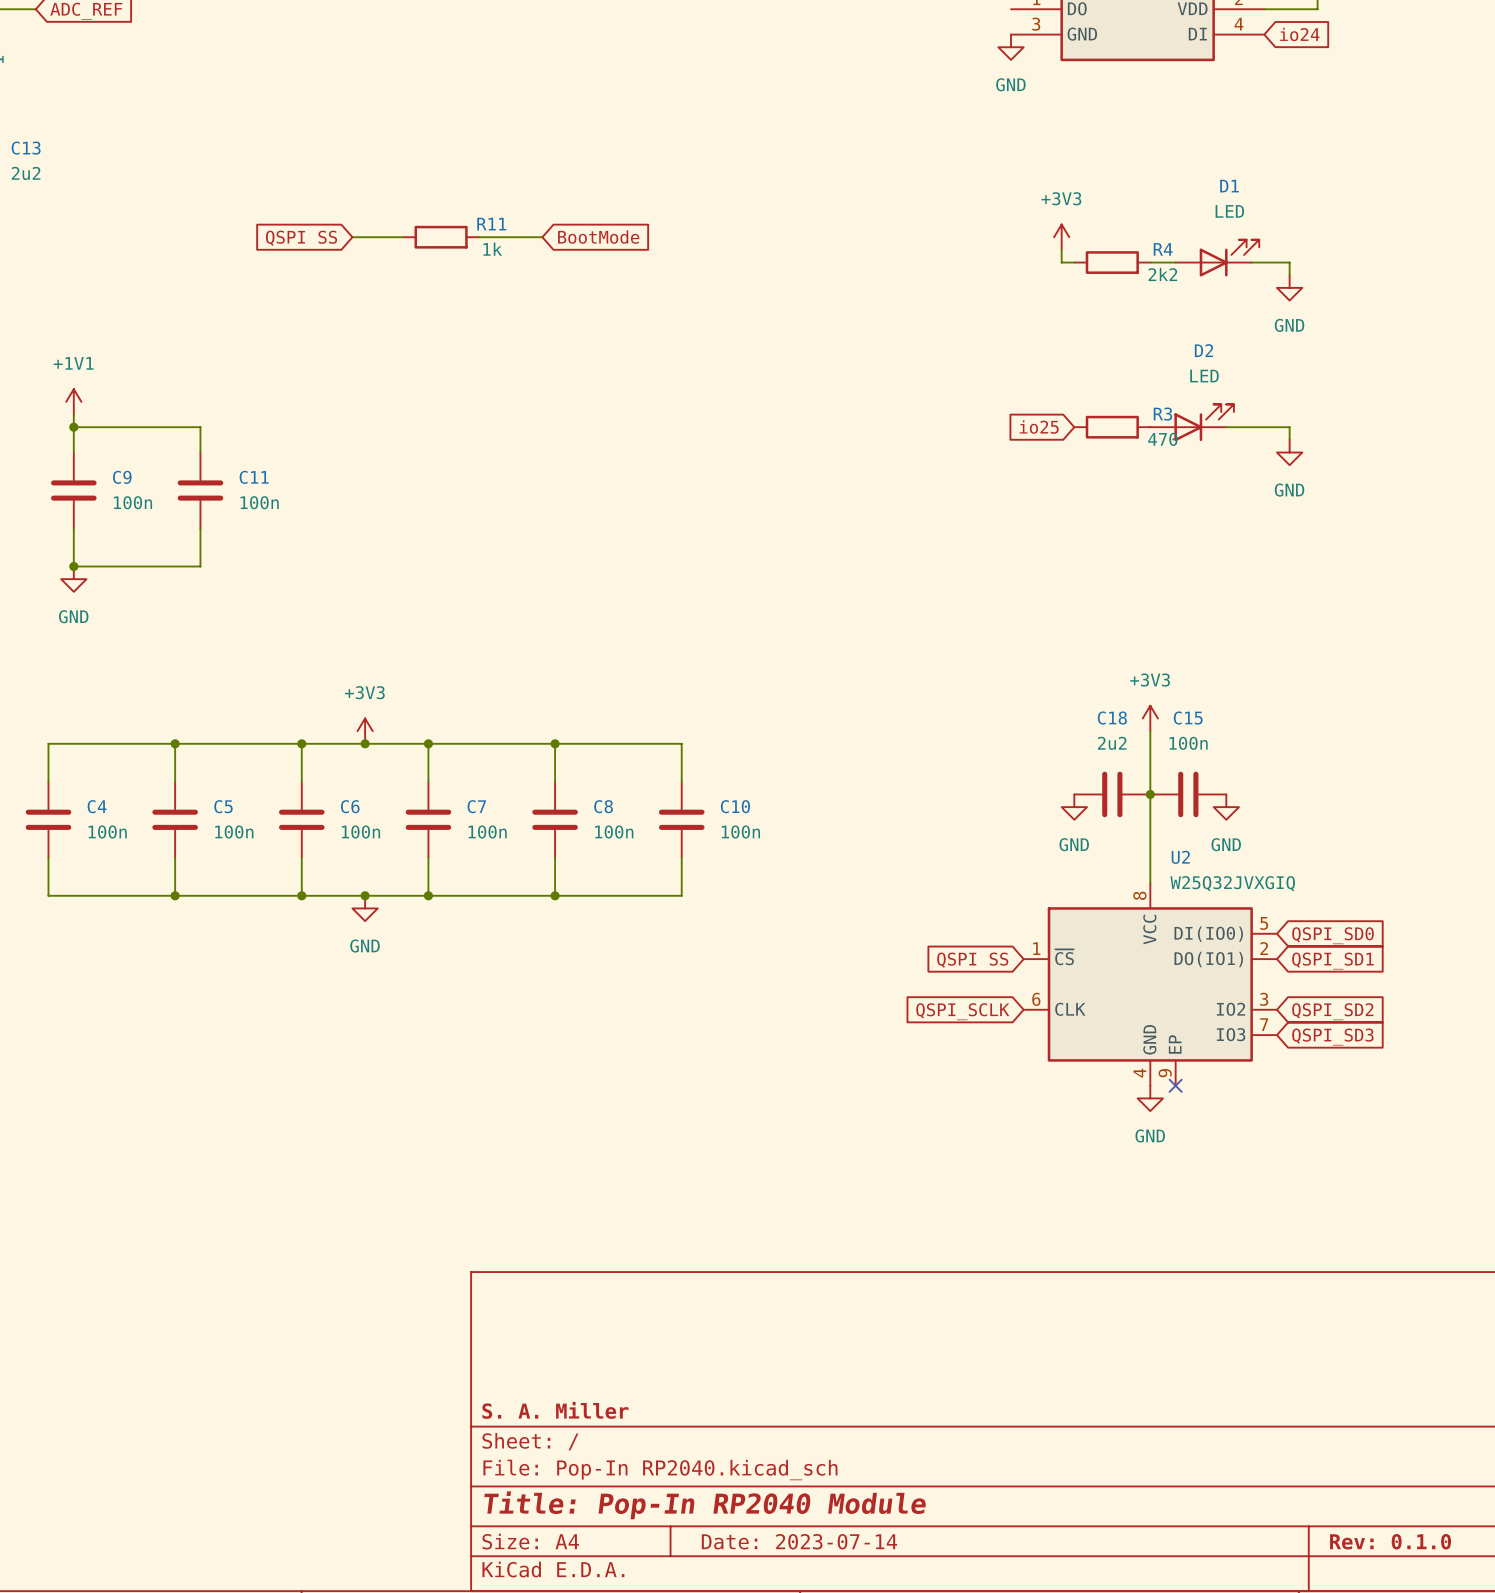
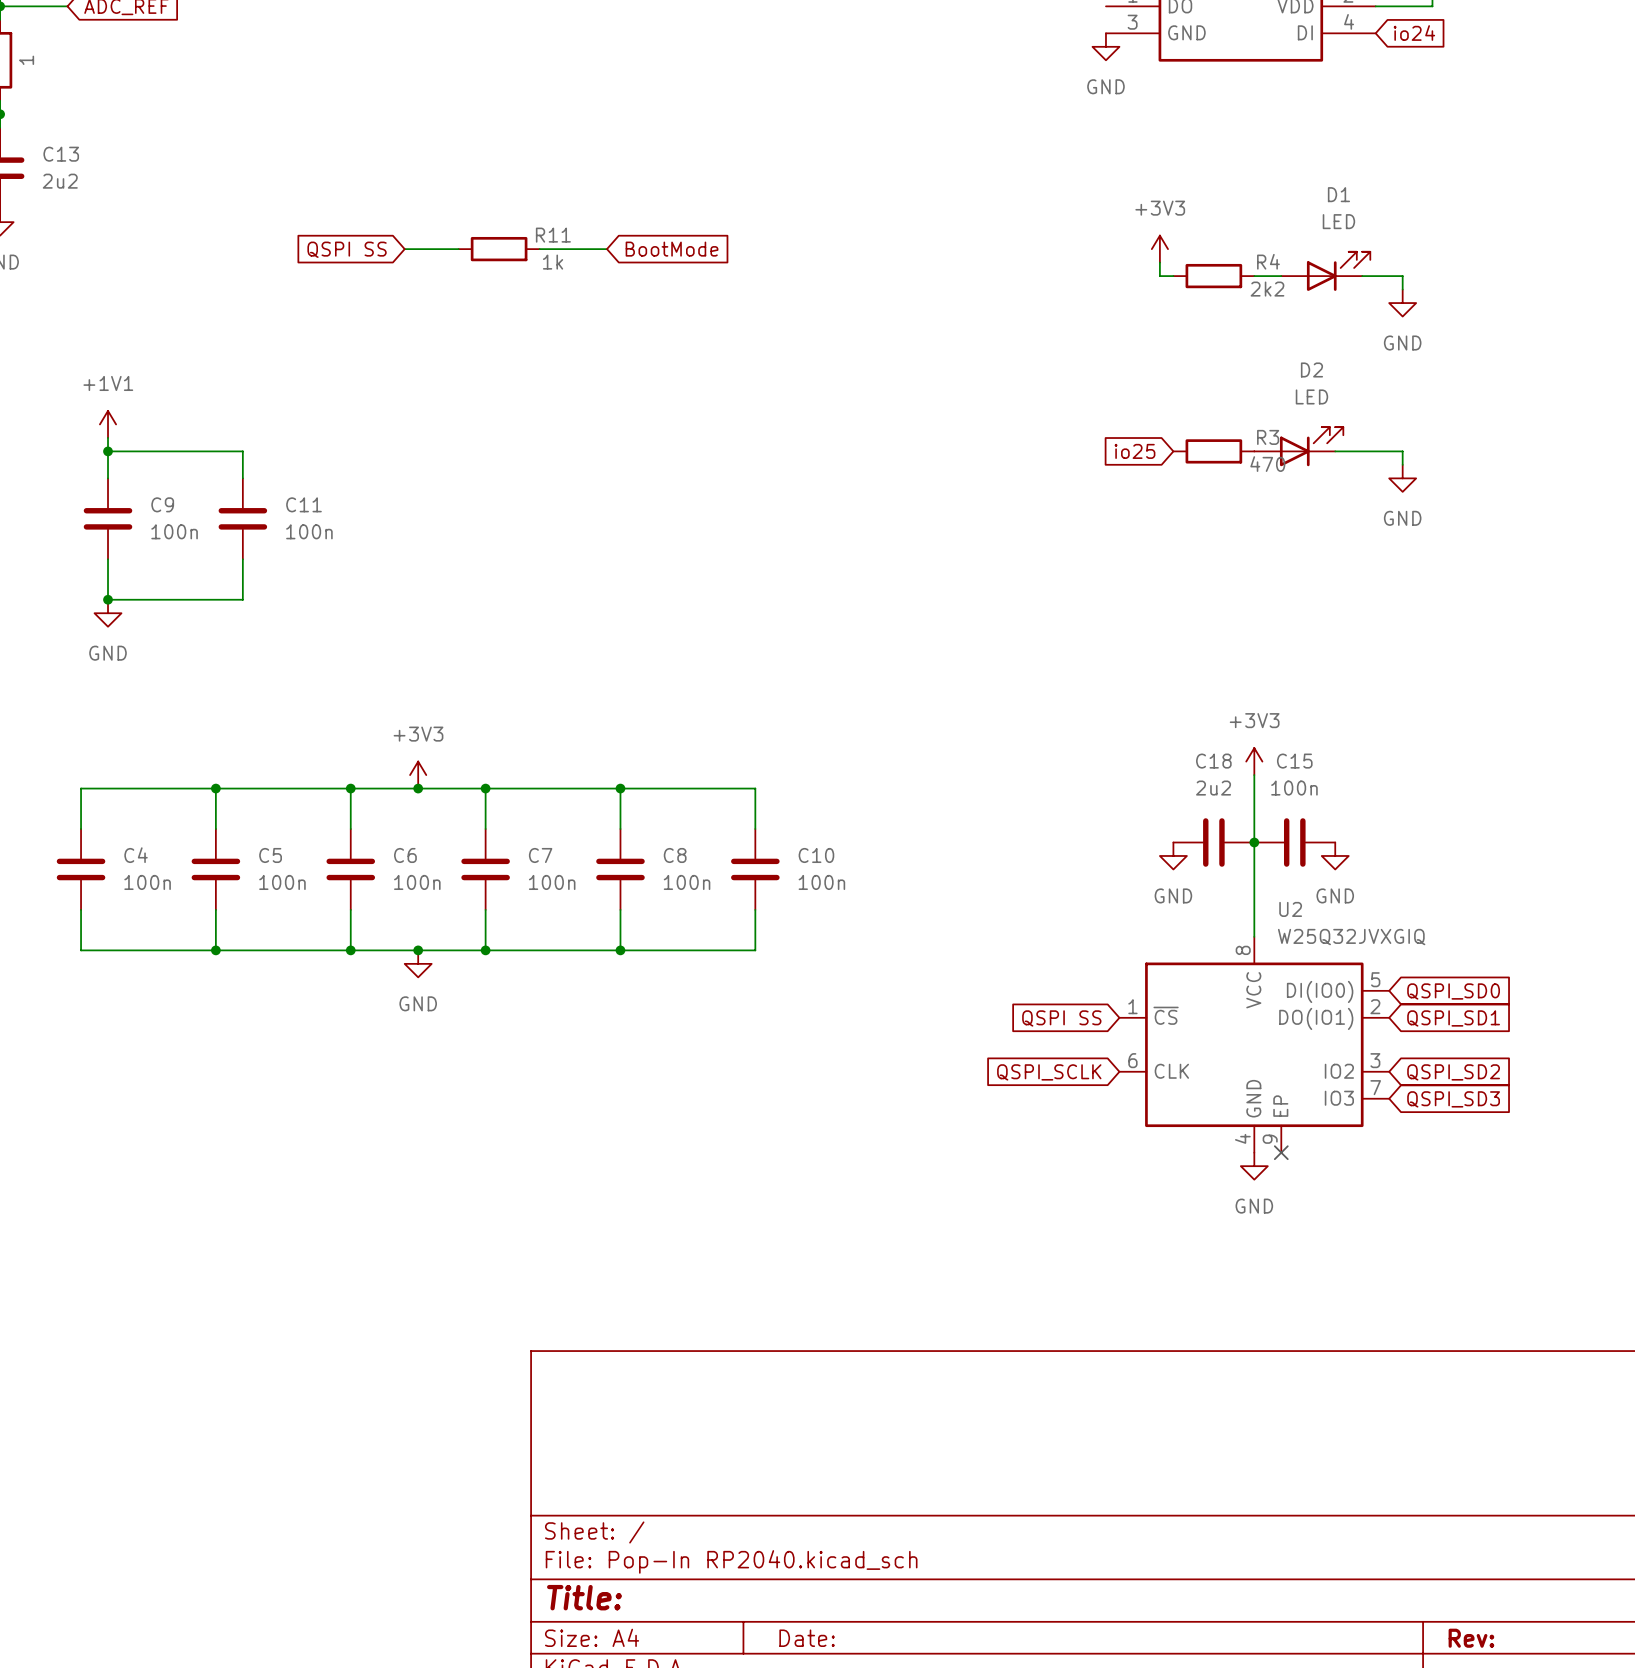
title block: S. A. Miller (555, 1410) -> none
title block: Title: Pop-In RP2040 Module (705, 1505) -> Title: (584, 1597)
title block: Date: 2023-07-14 (799, 1541) -> Date: (807, 1638)
title block: Rev: 0.1.0 (1390, 1541) -> Rev: (1471, 1638)

